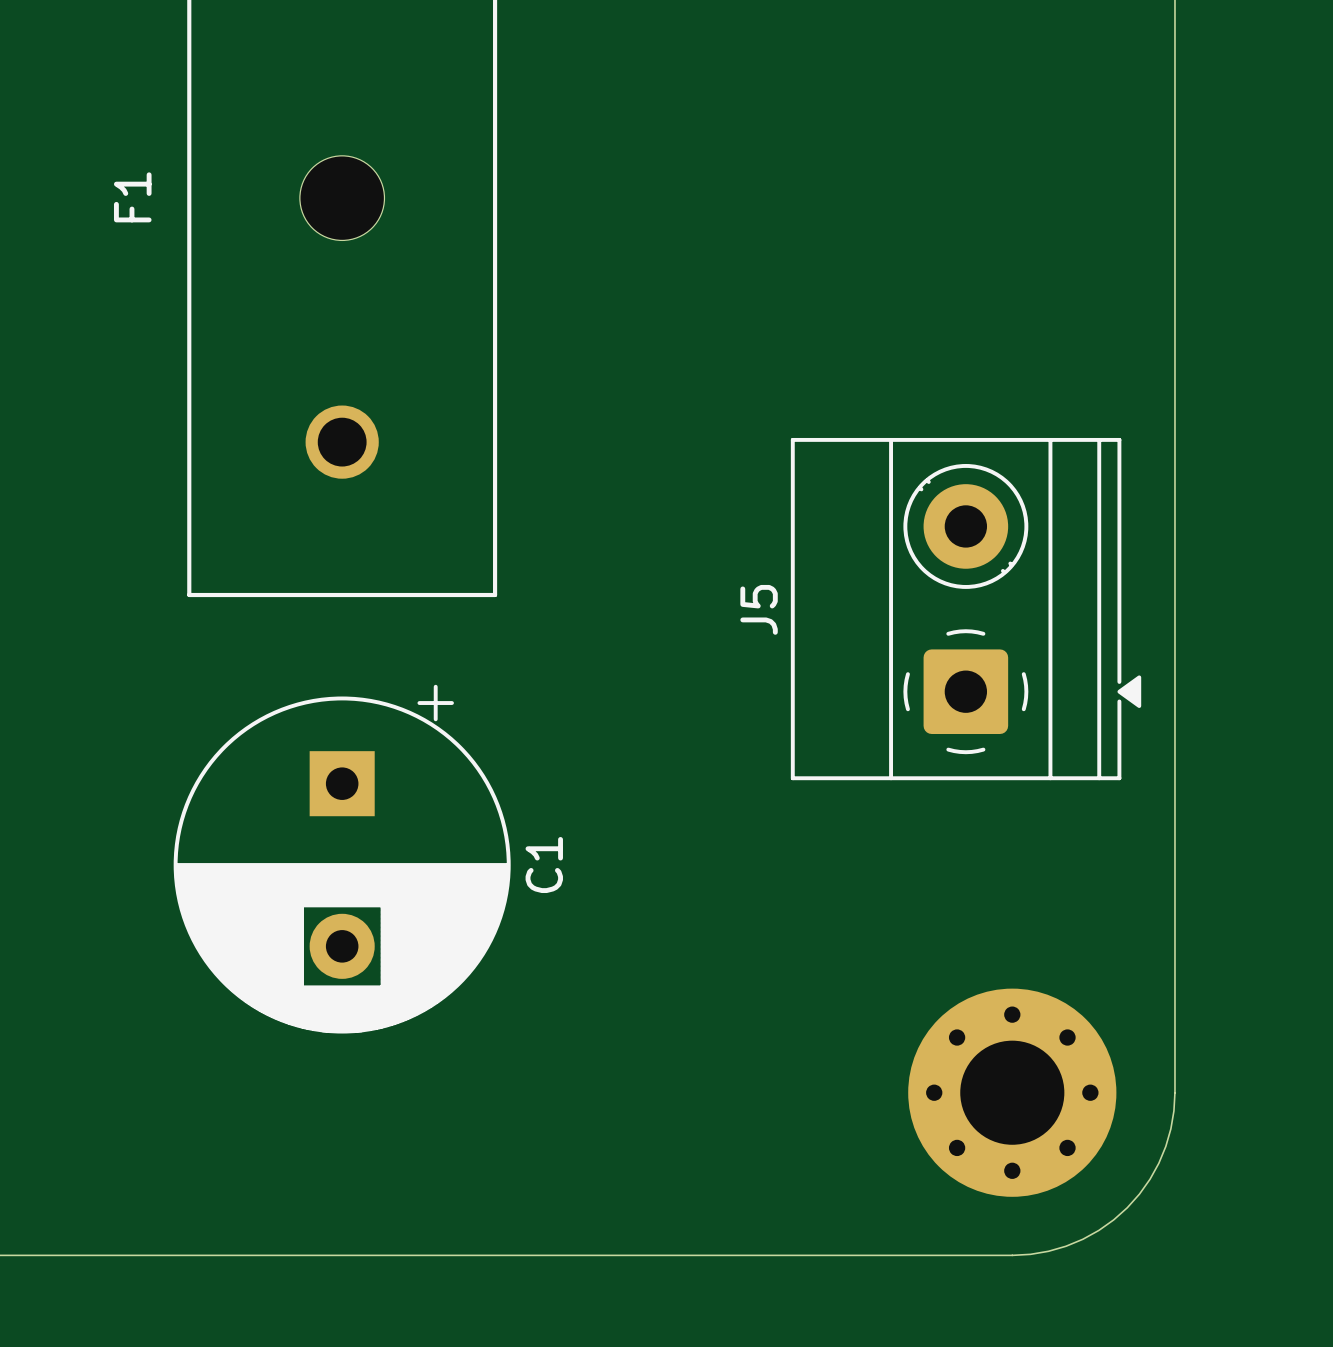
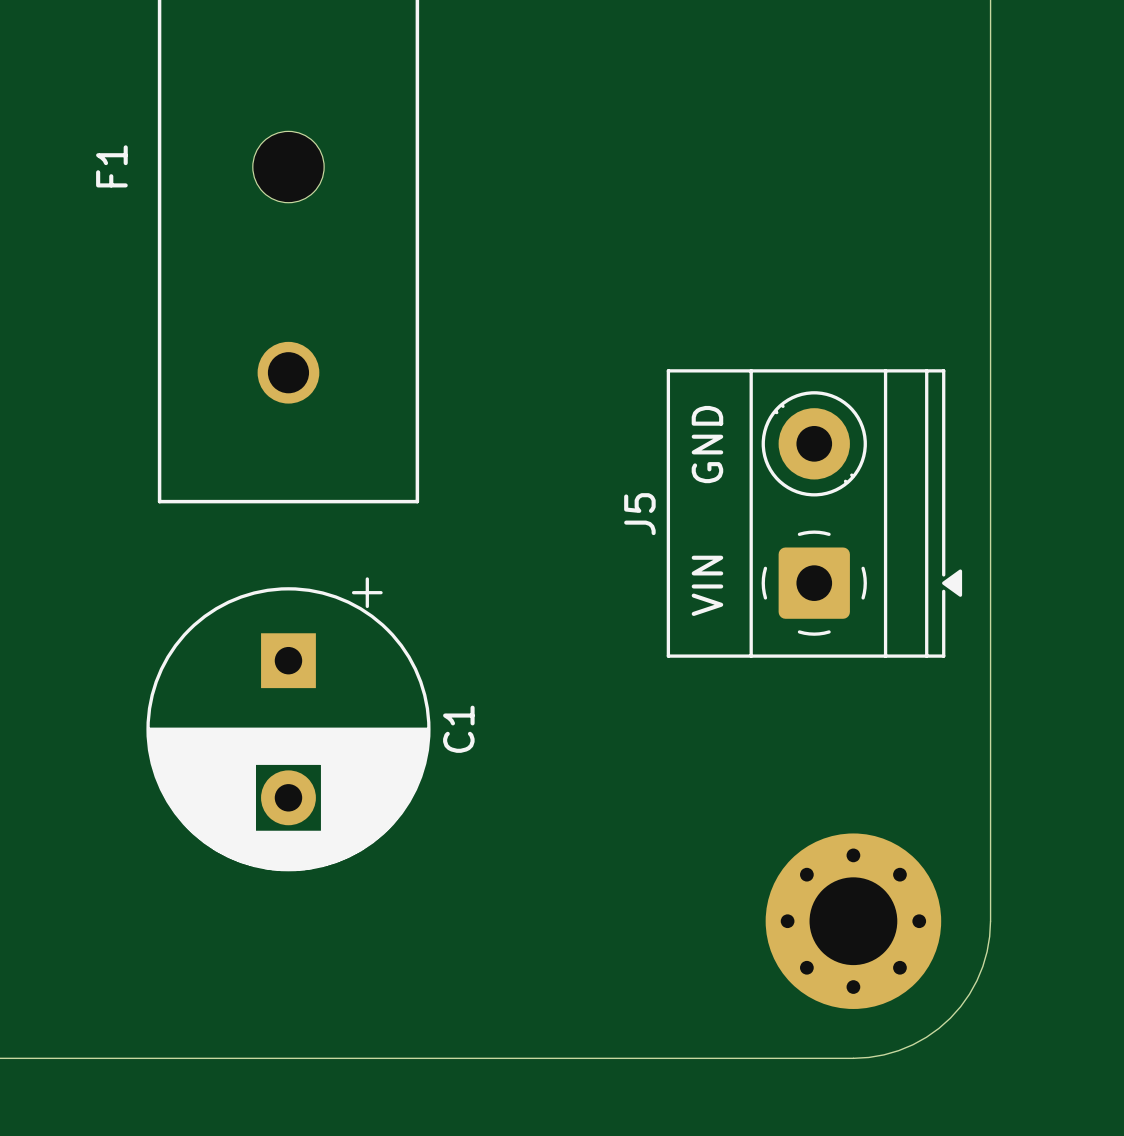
text: none -> GND (707, 444)
text: none -> VIN (707, 585)

